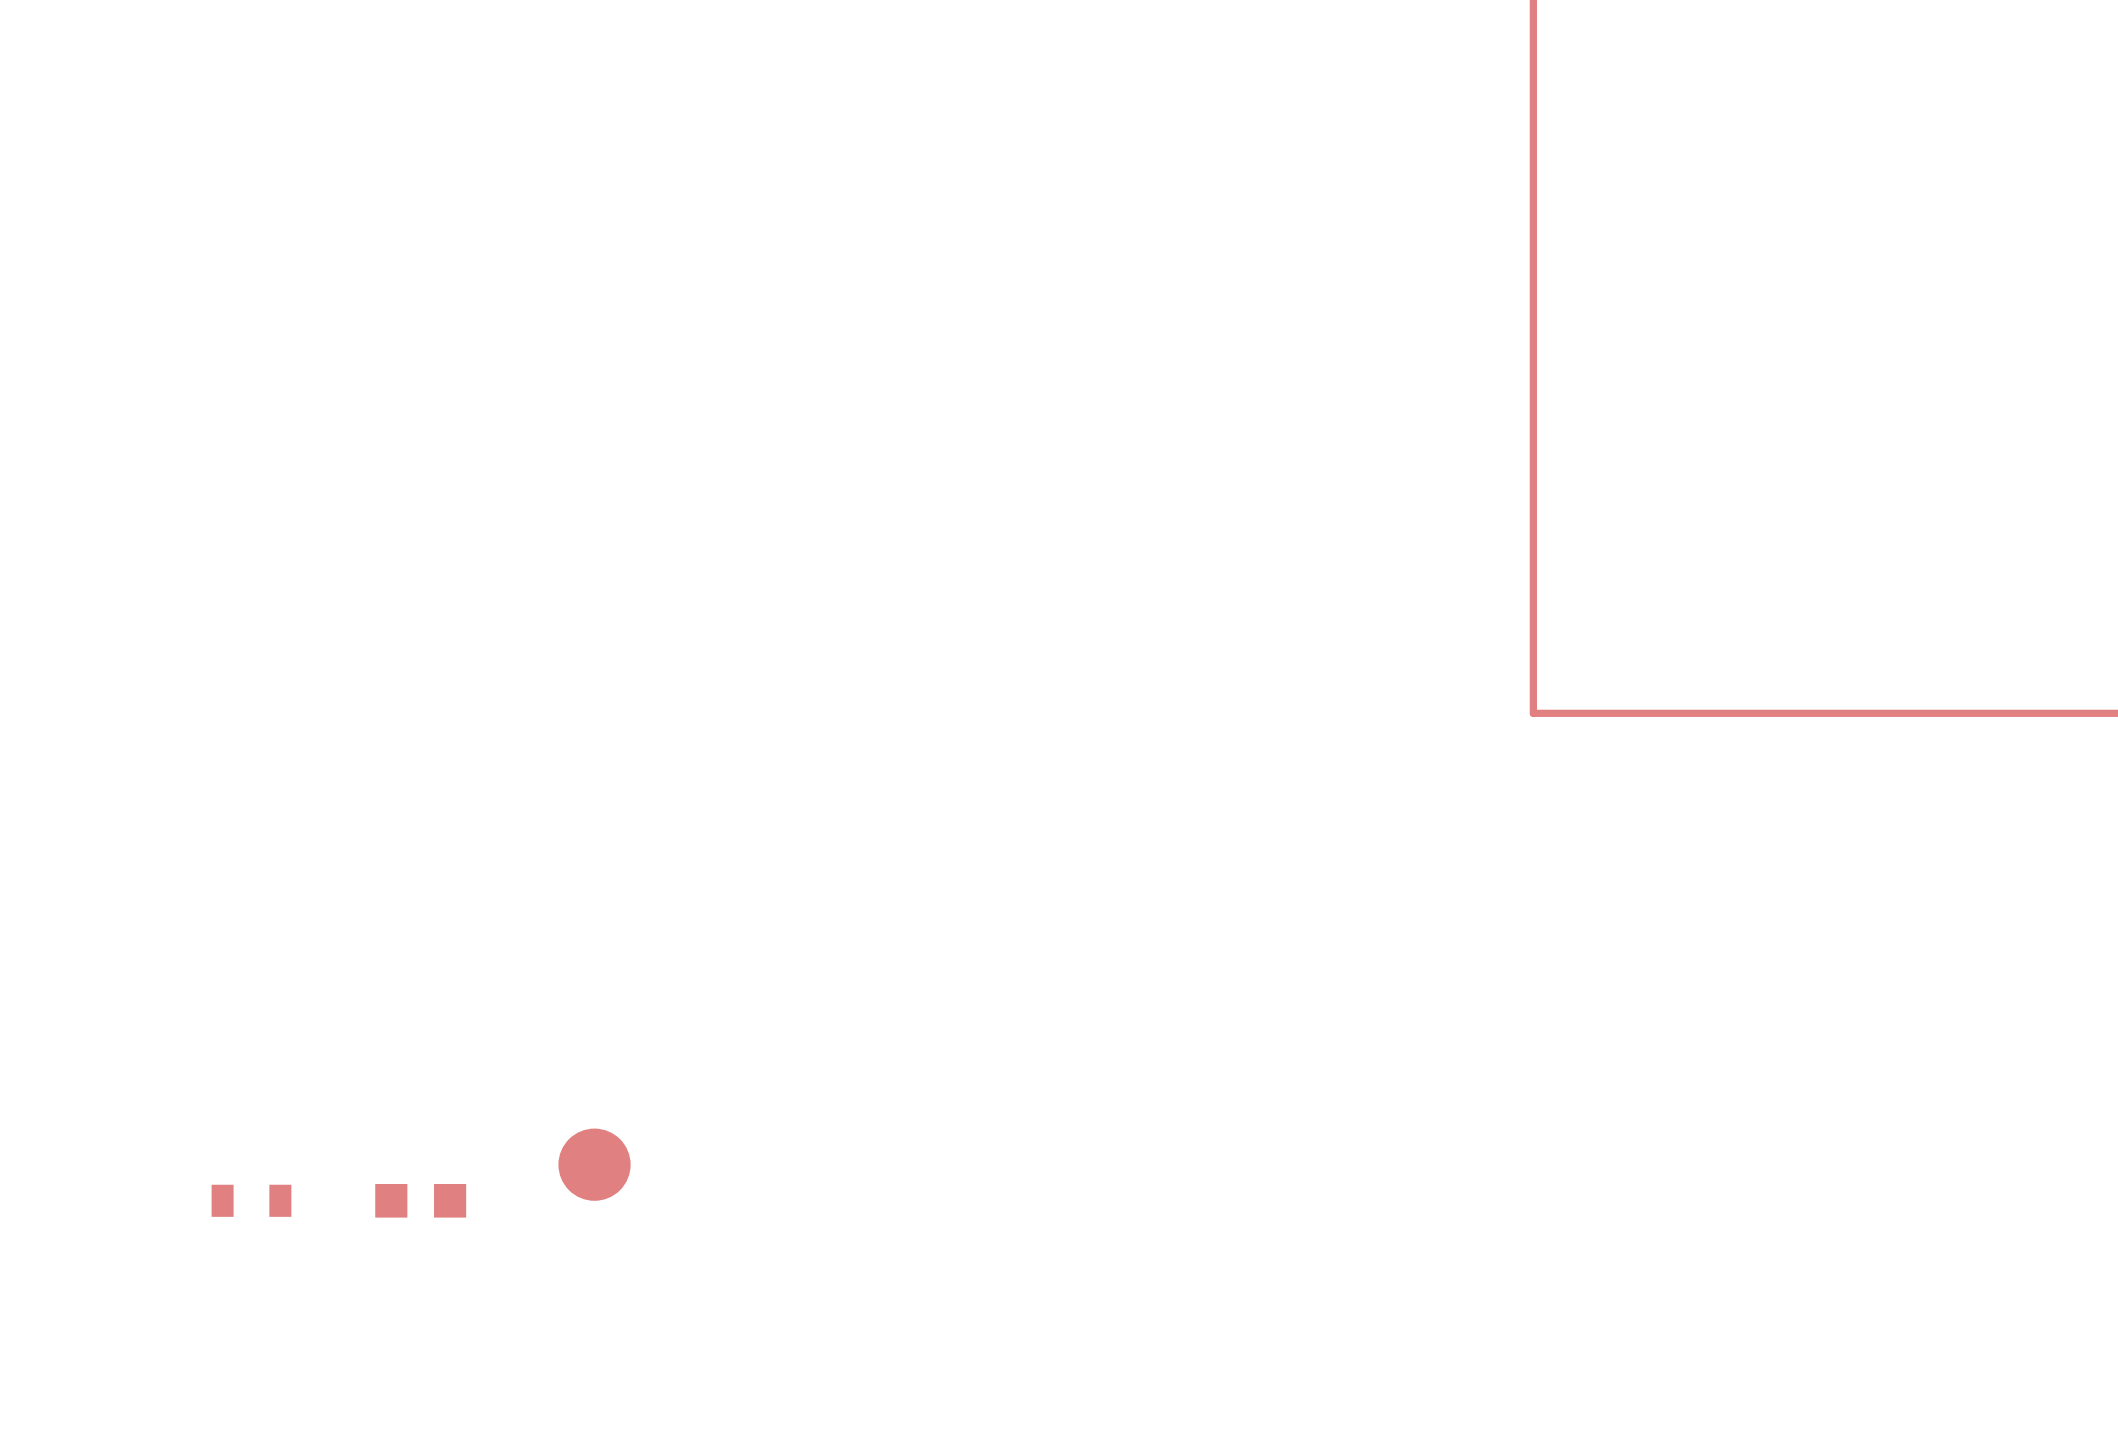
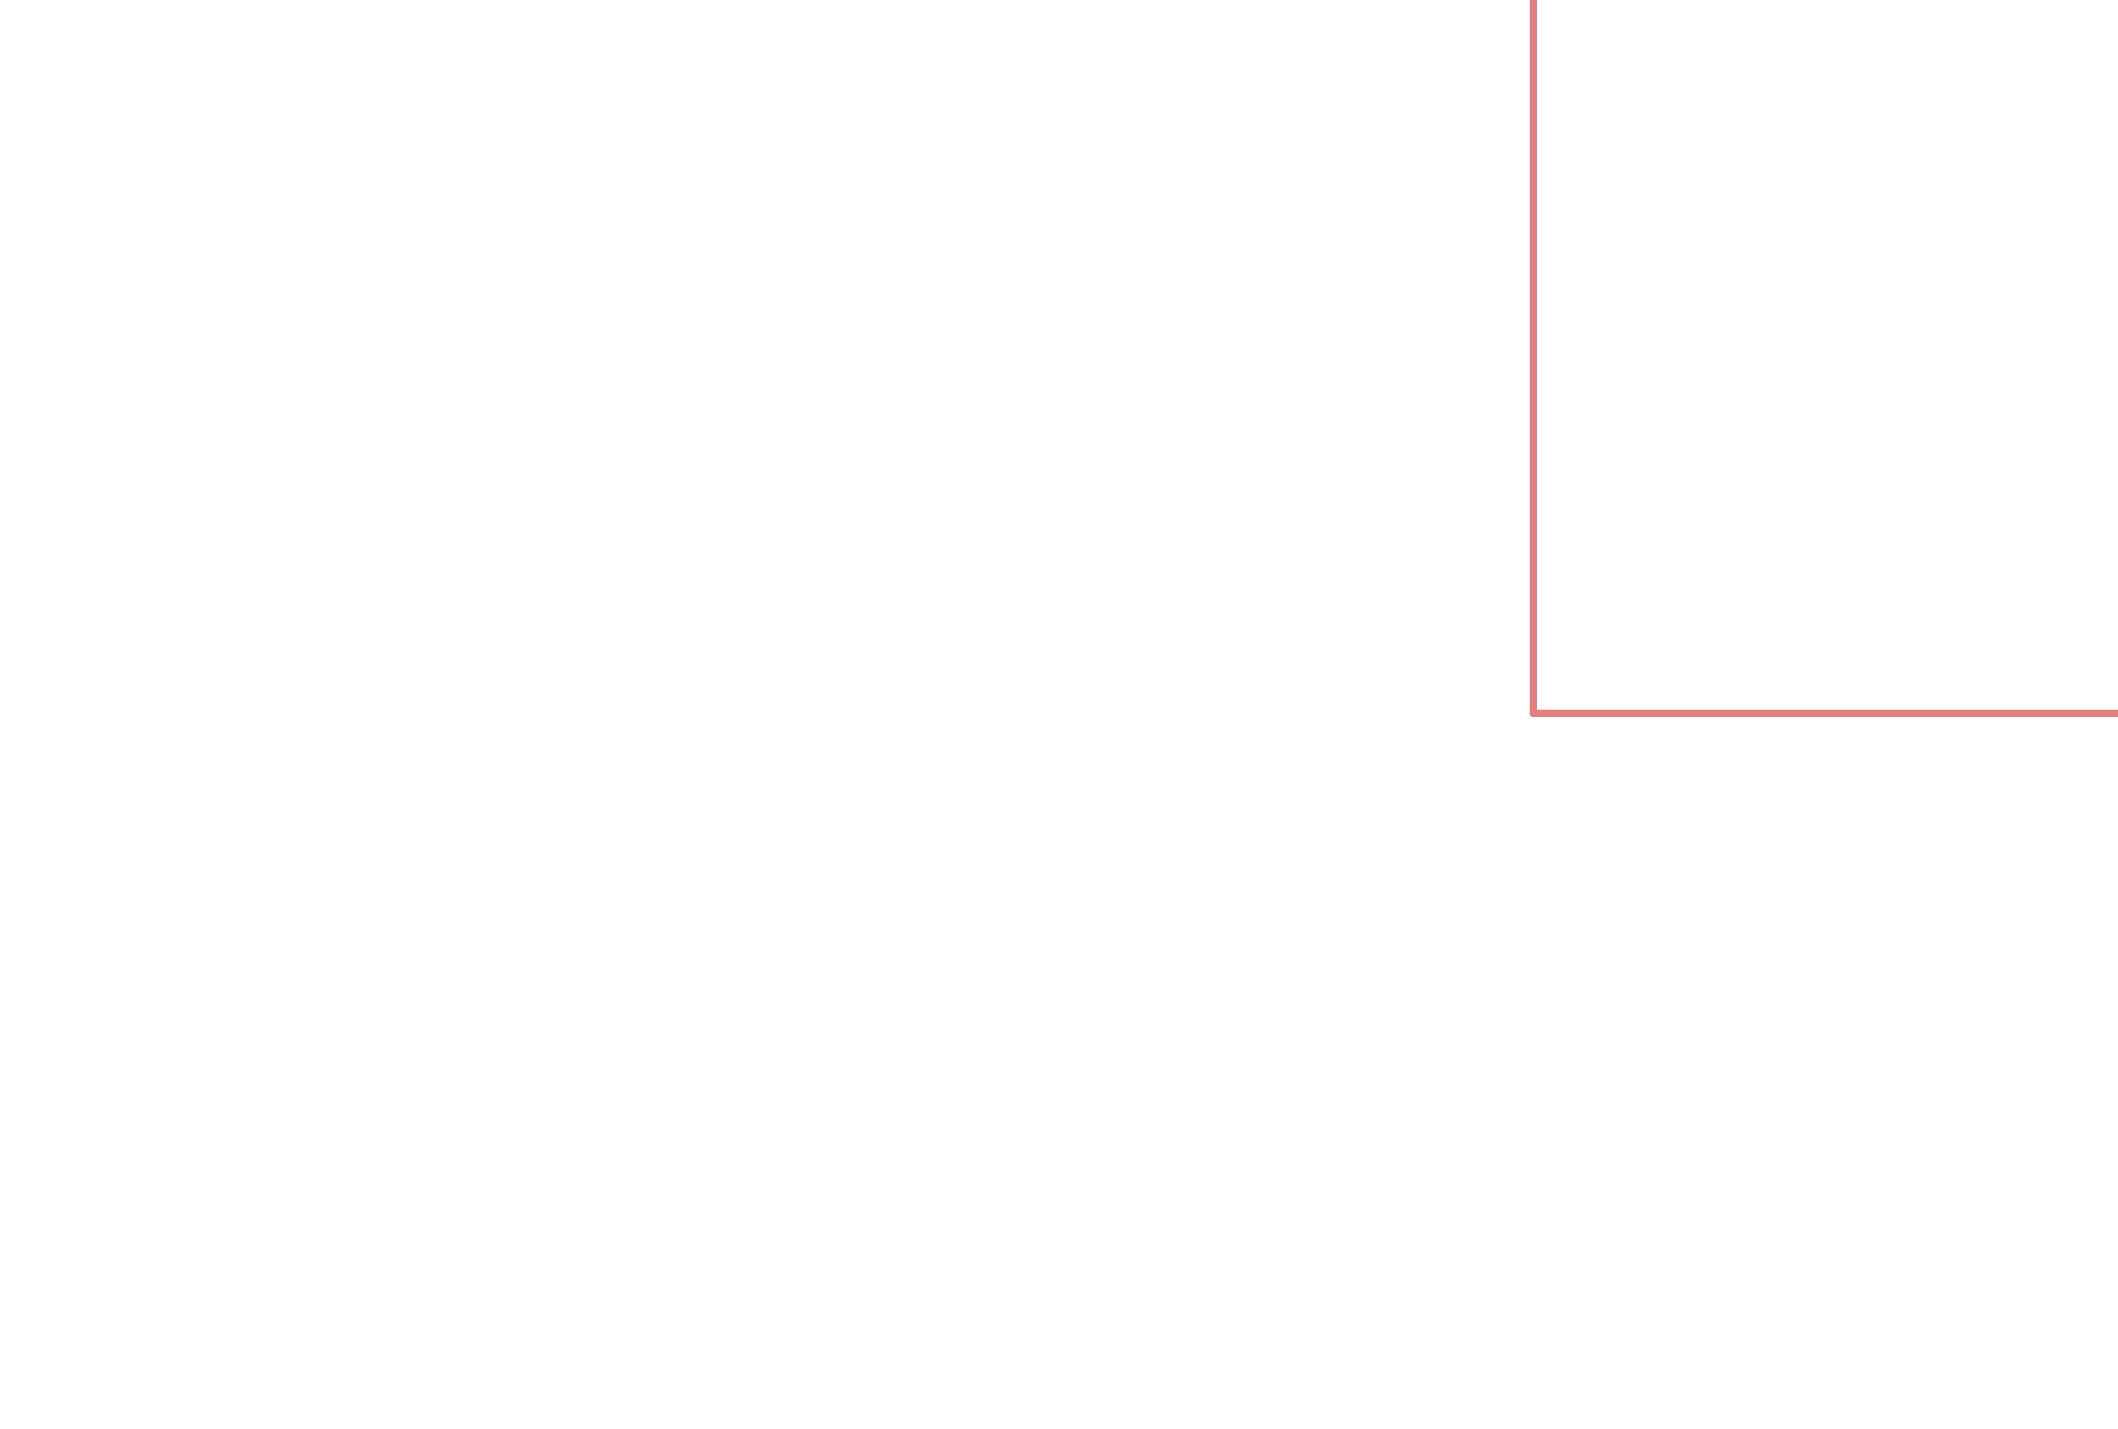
part: (594, 1164) -> none
part: (251, 1200) -> none
part: (420, 1200) -> none

